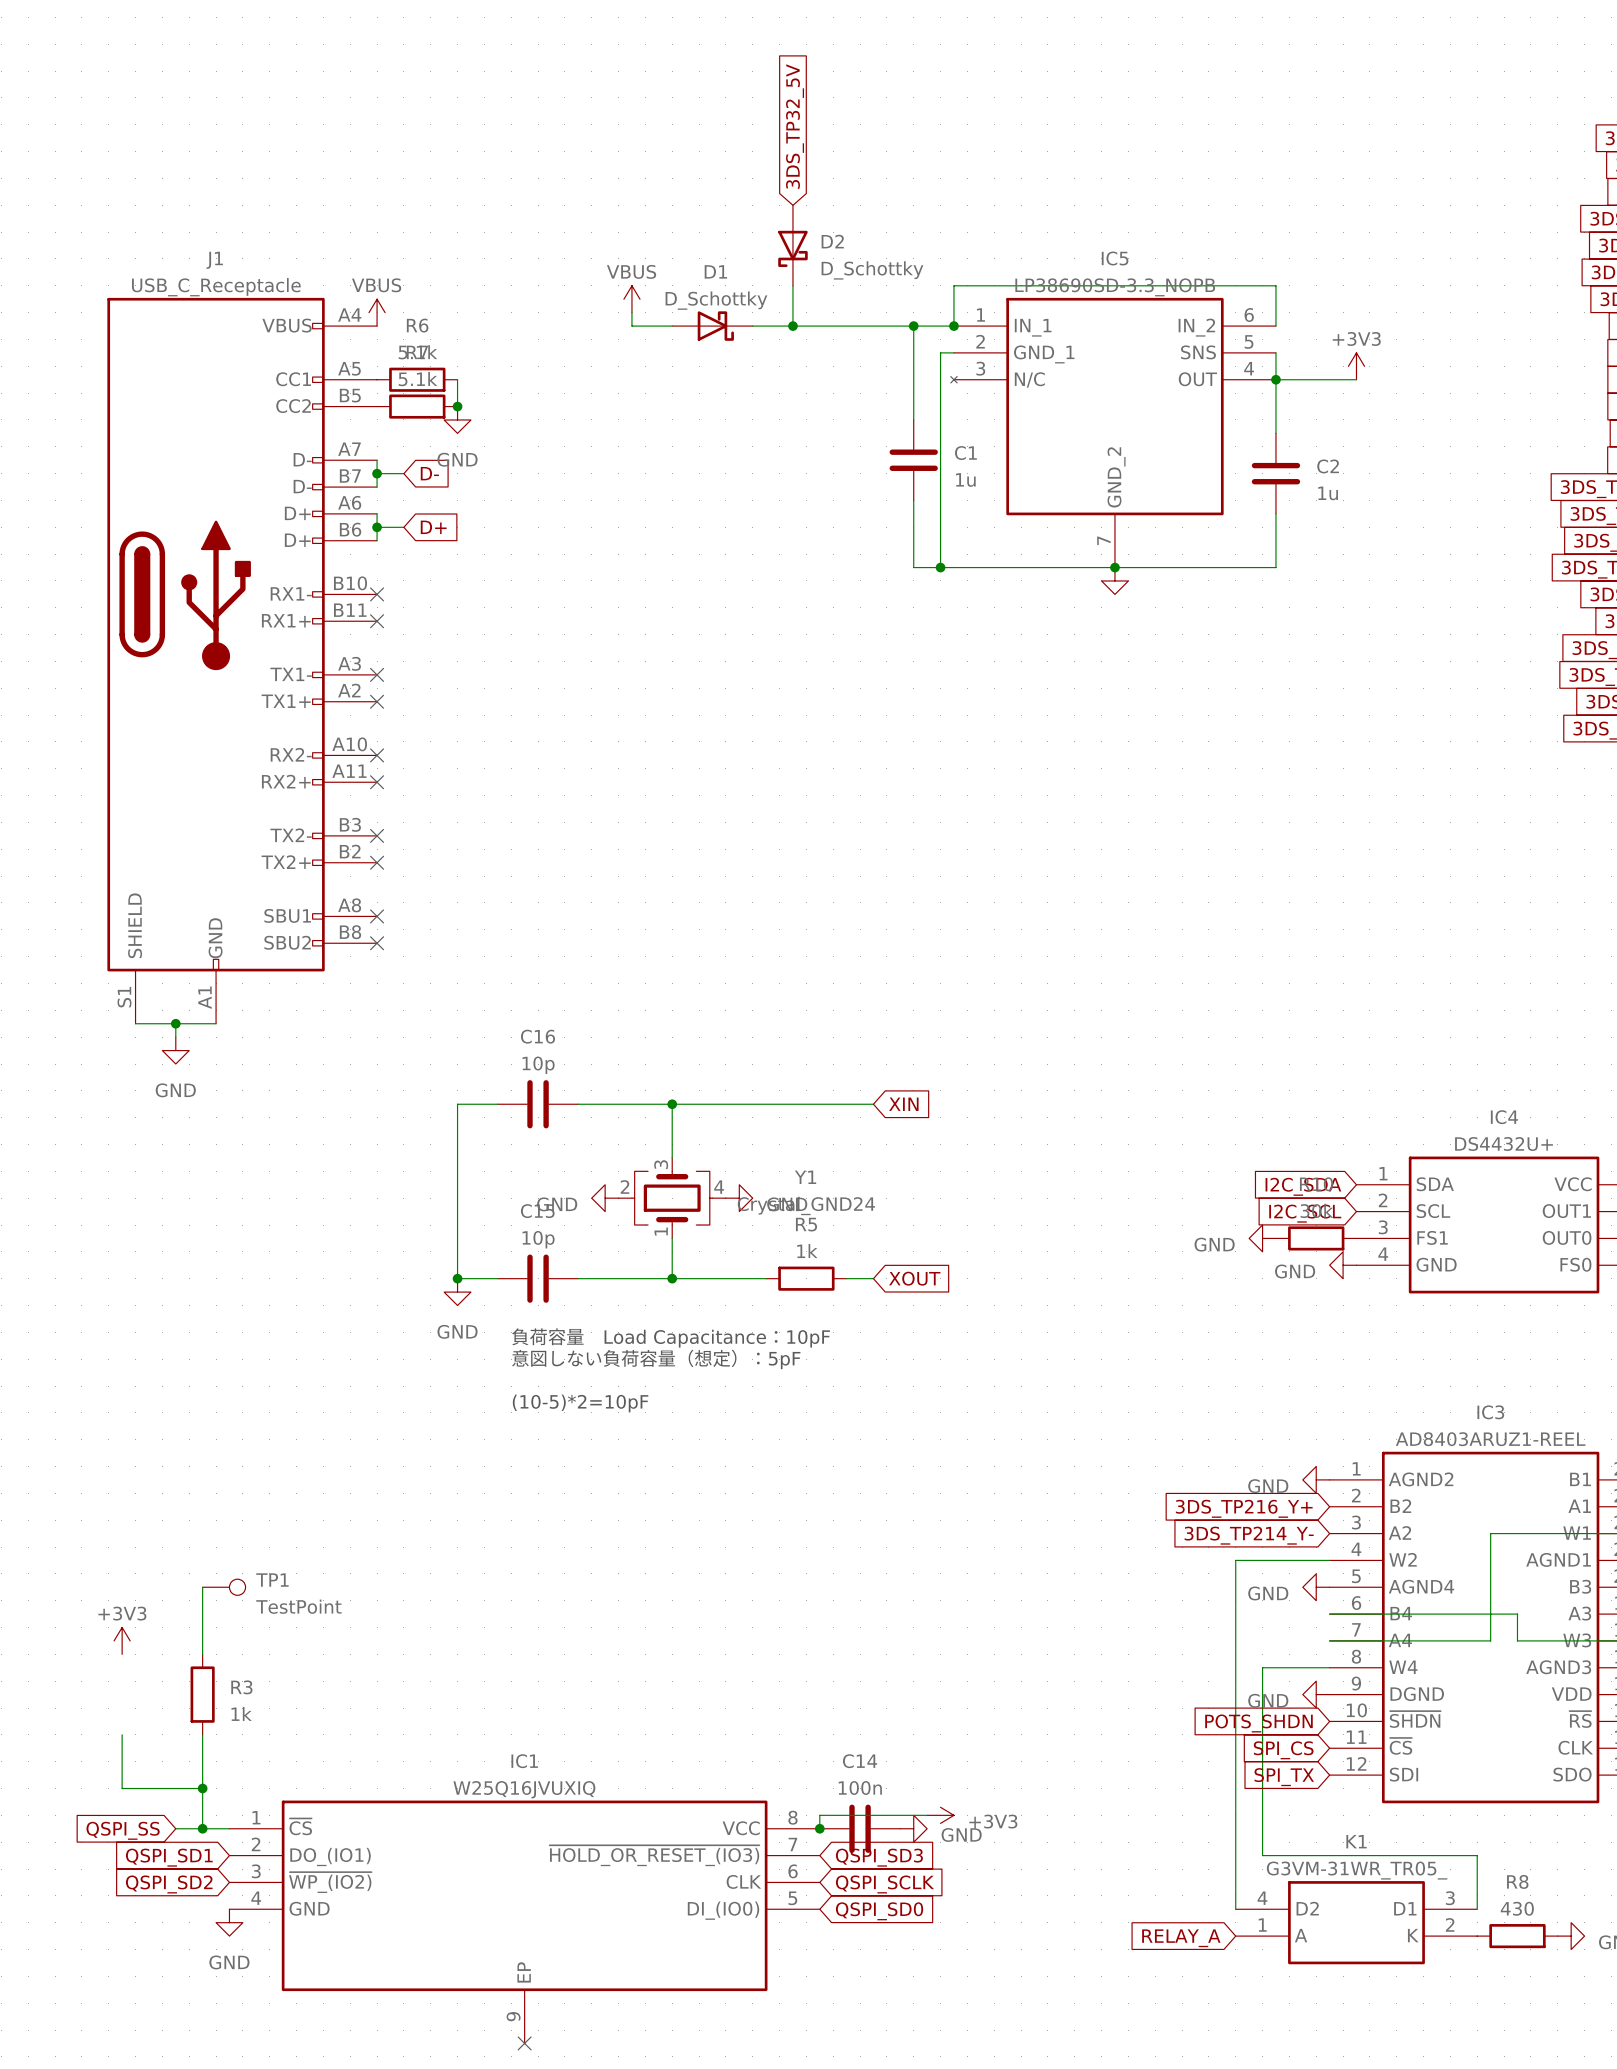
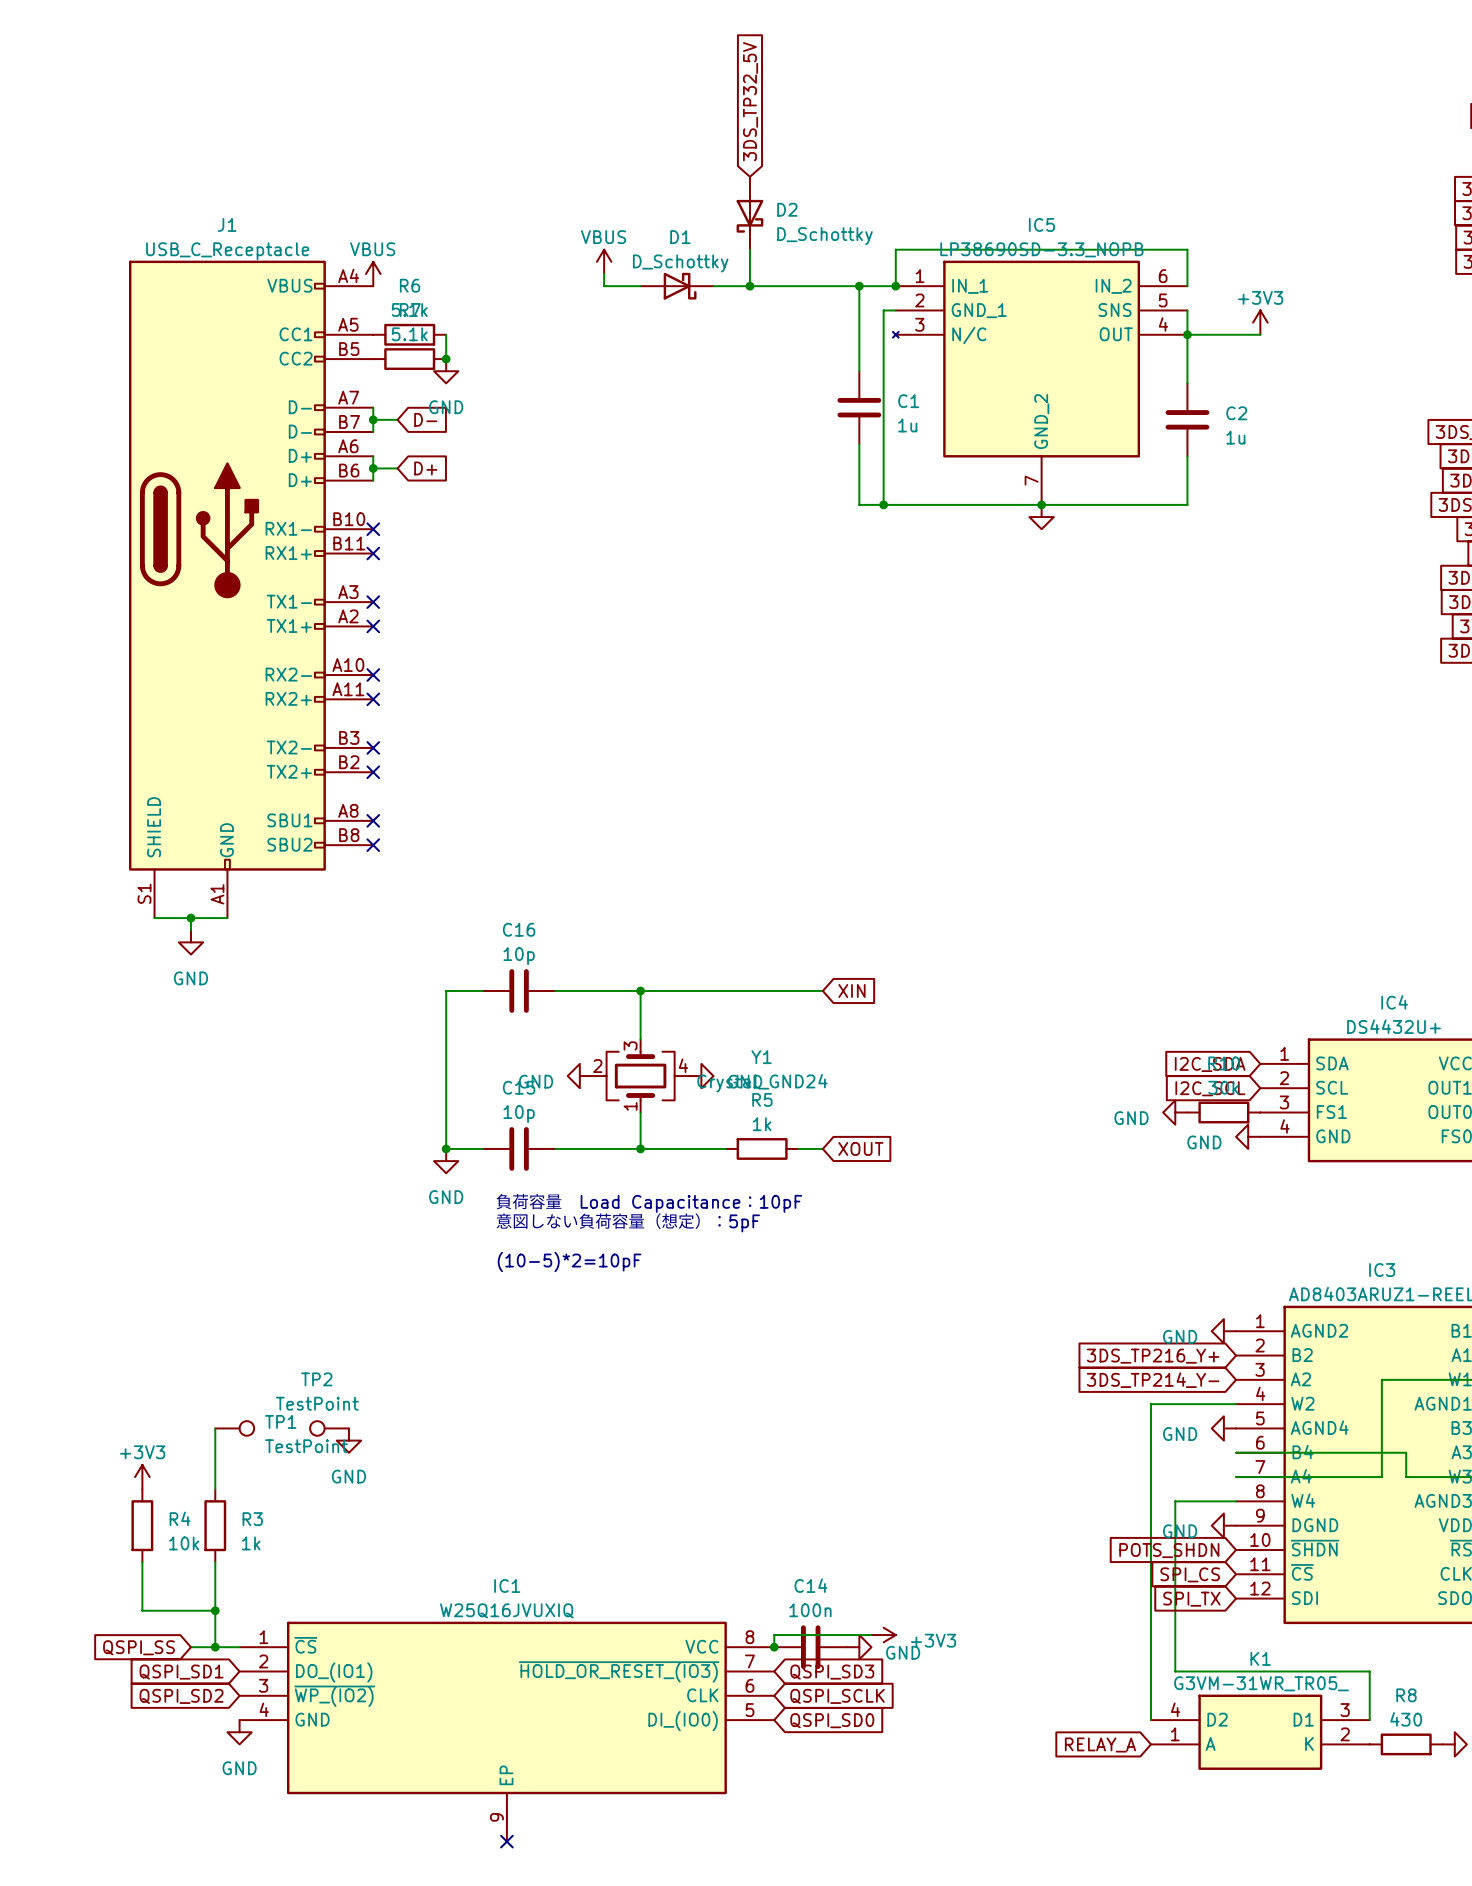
TP2: none -> TestPoint (329, 1428)
power symbol: none -> GND (348, 1440)
R4: none -> 10k (142, 1525)

